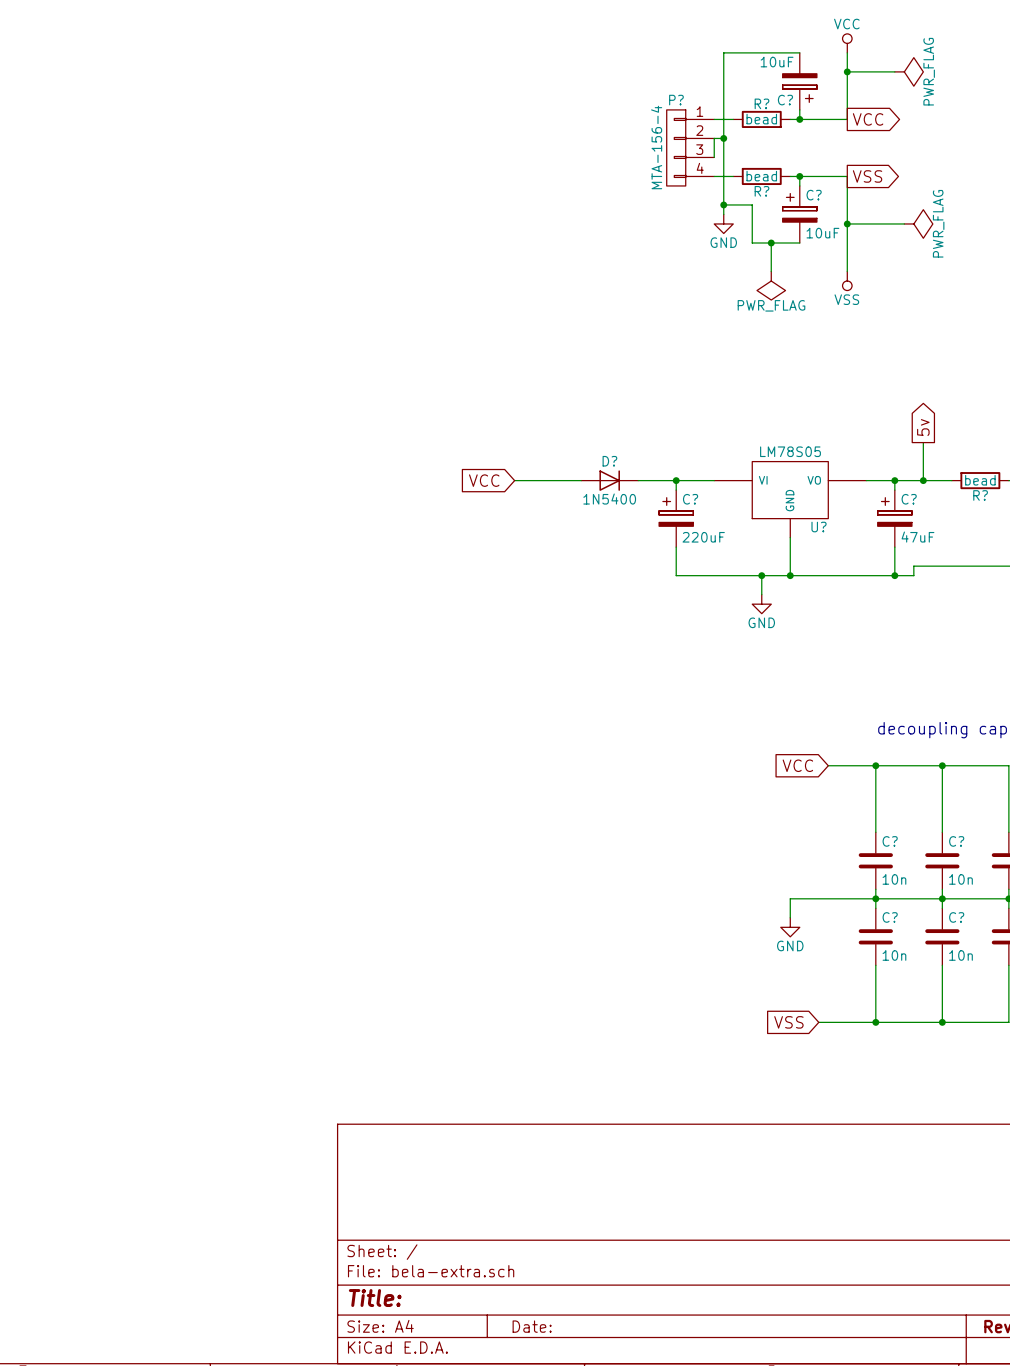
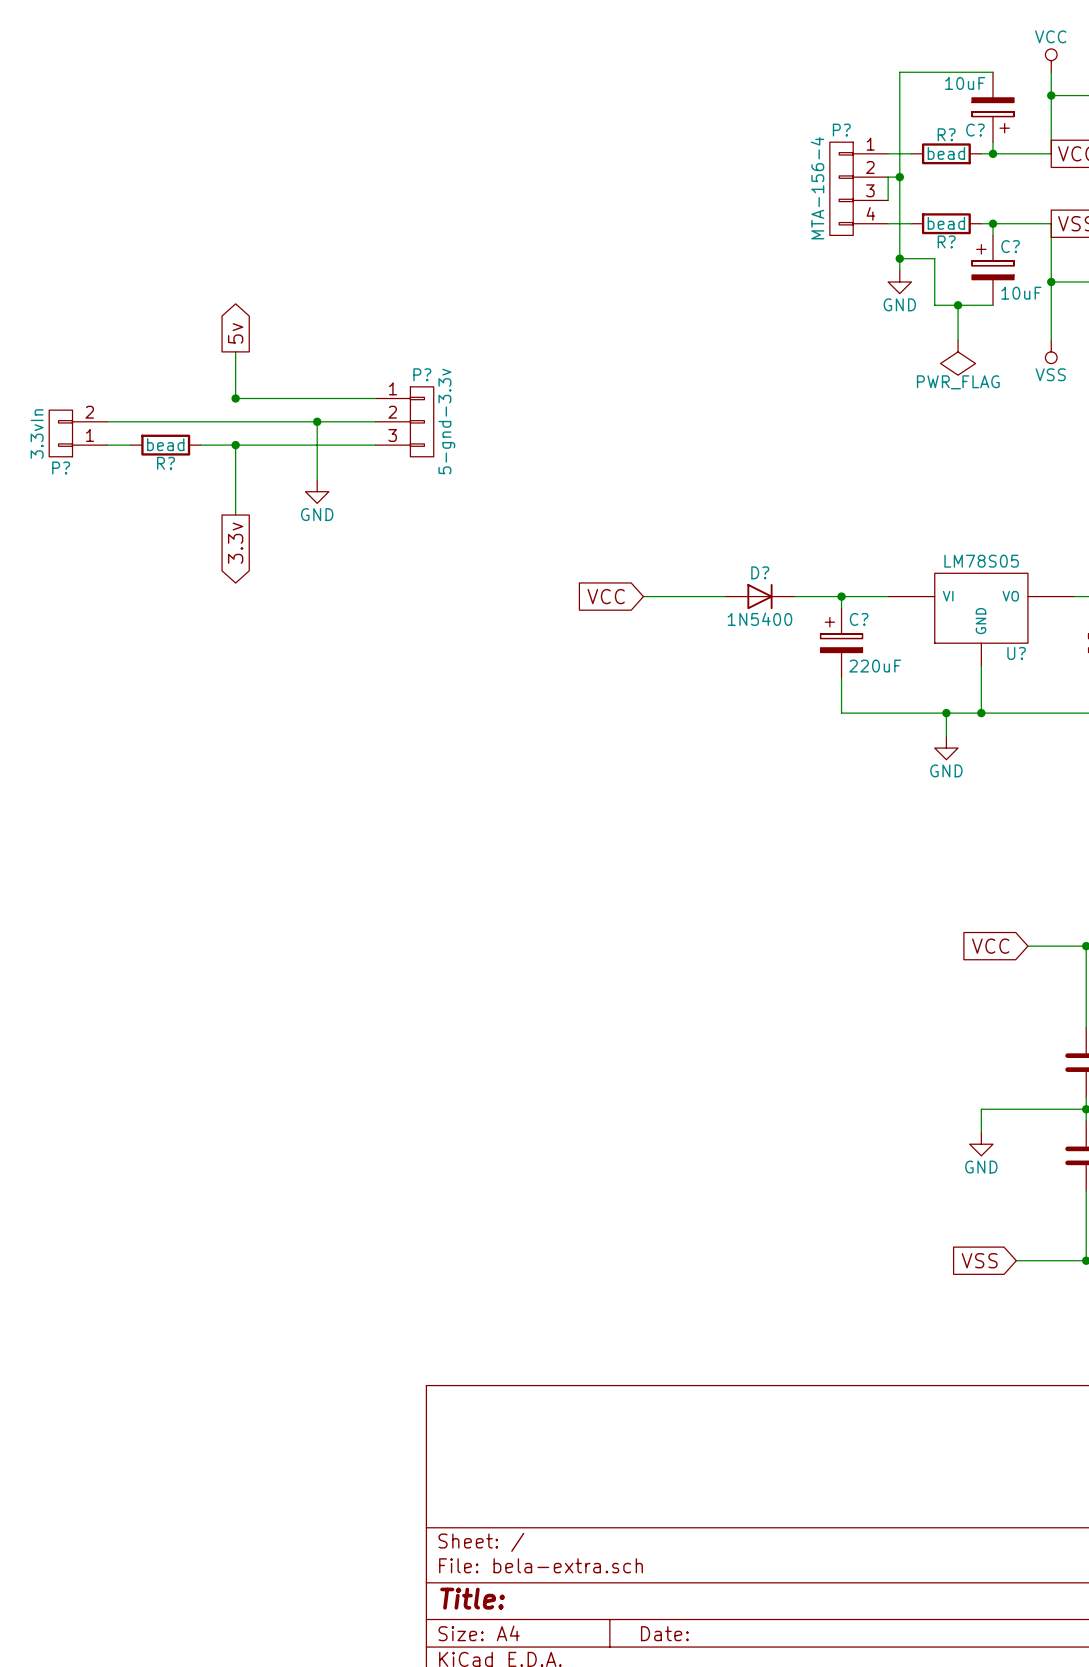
global label: none -> 5v (235, 333)
wire: none -> (235, 351) (235, 398) (375, 398)
junction: none -> (235, 398)
wire: none -> (107, 421) (375, 421)
wire: none -> (317, 421) (317, 480)
junction: none -> (317, 421)
P?: none -> 5-gnd-3.3v (404, 421)
P?: none -> 3.3vIn (78, 433)
wire: none -> (107, 445) (130, 445)
R?: none -> bead (165, 445)
wire: none -> (200, 445) (375, 445)
wire: none -> (235, 445) (235, 515)
junction: none -> (235, 445)
power symbol: none -> GND (317, 491)
global label: none -> 3.3v (235, 543)

